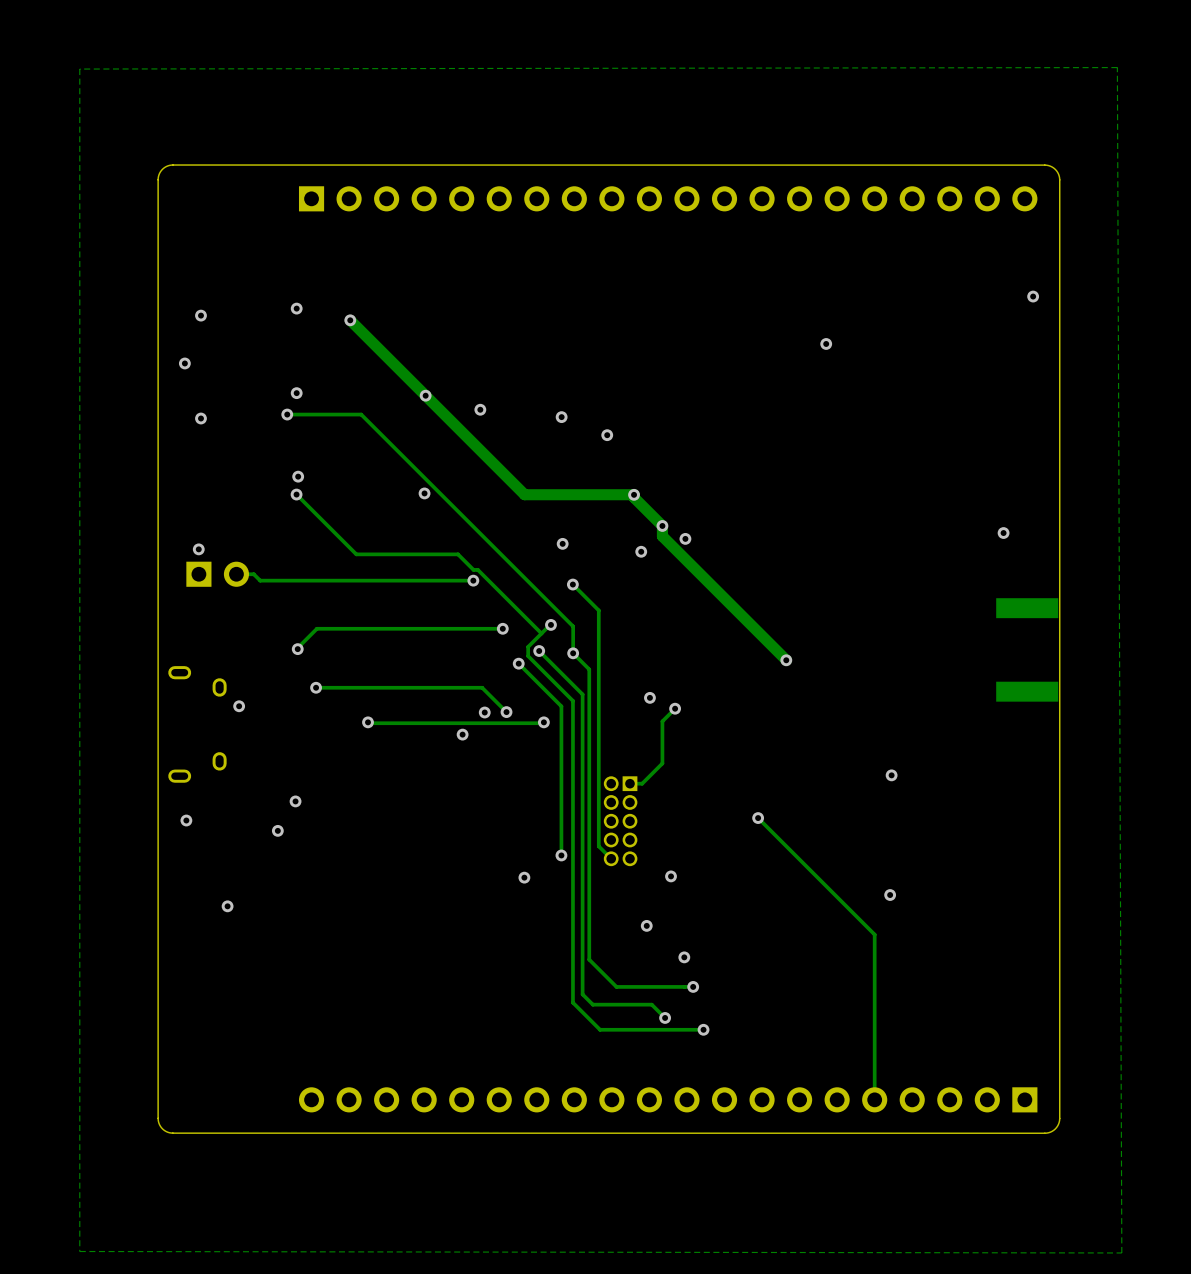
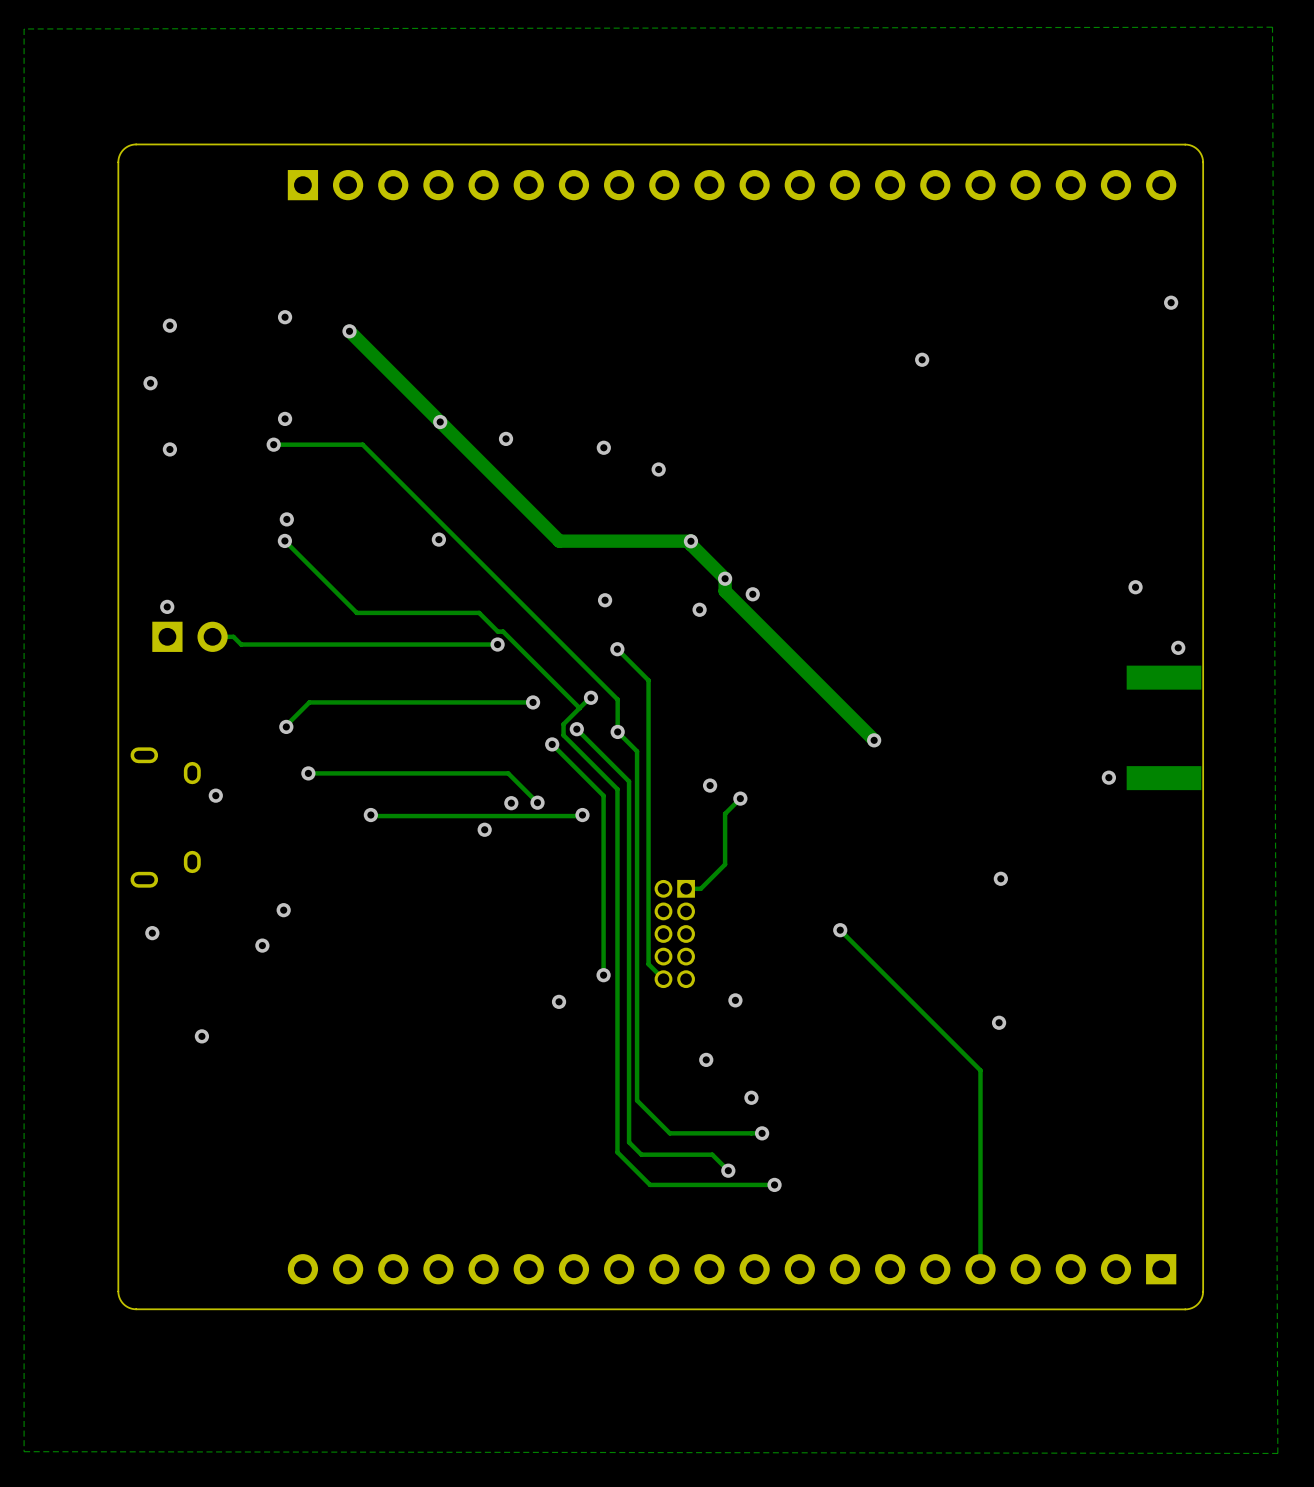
via: none -> (1178, 647)
via: none -> (1108, 777)

